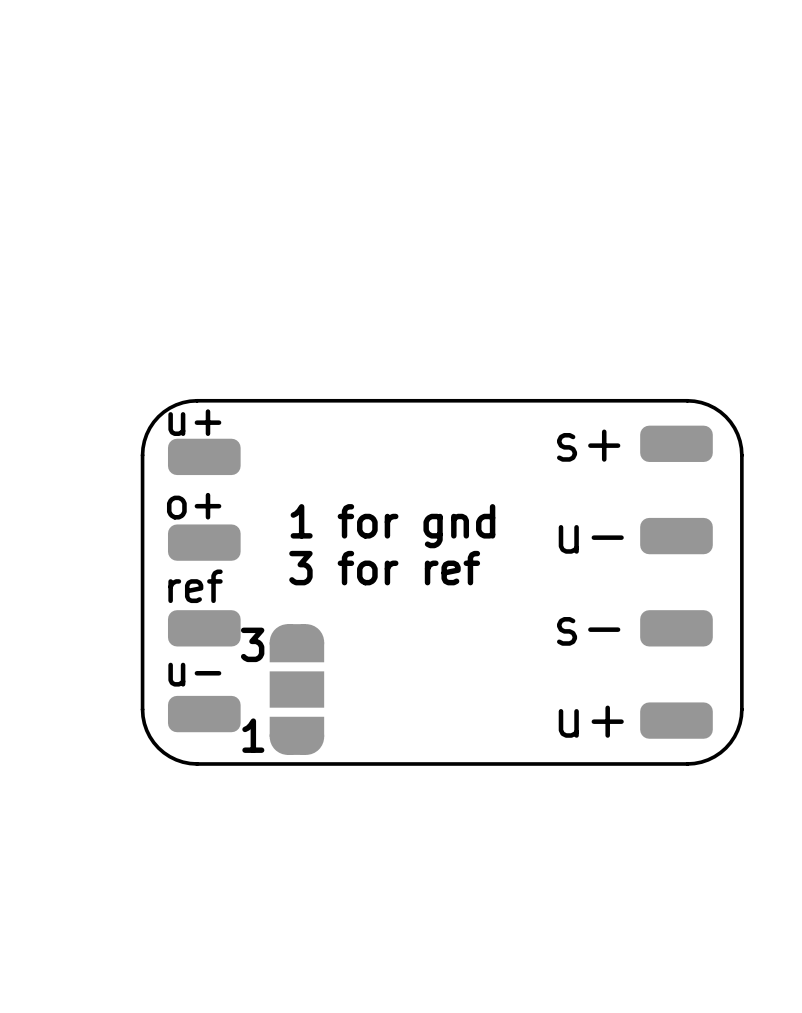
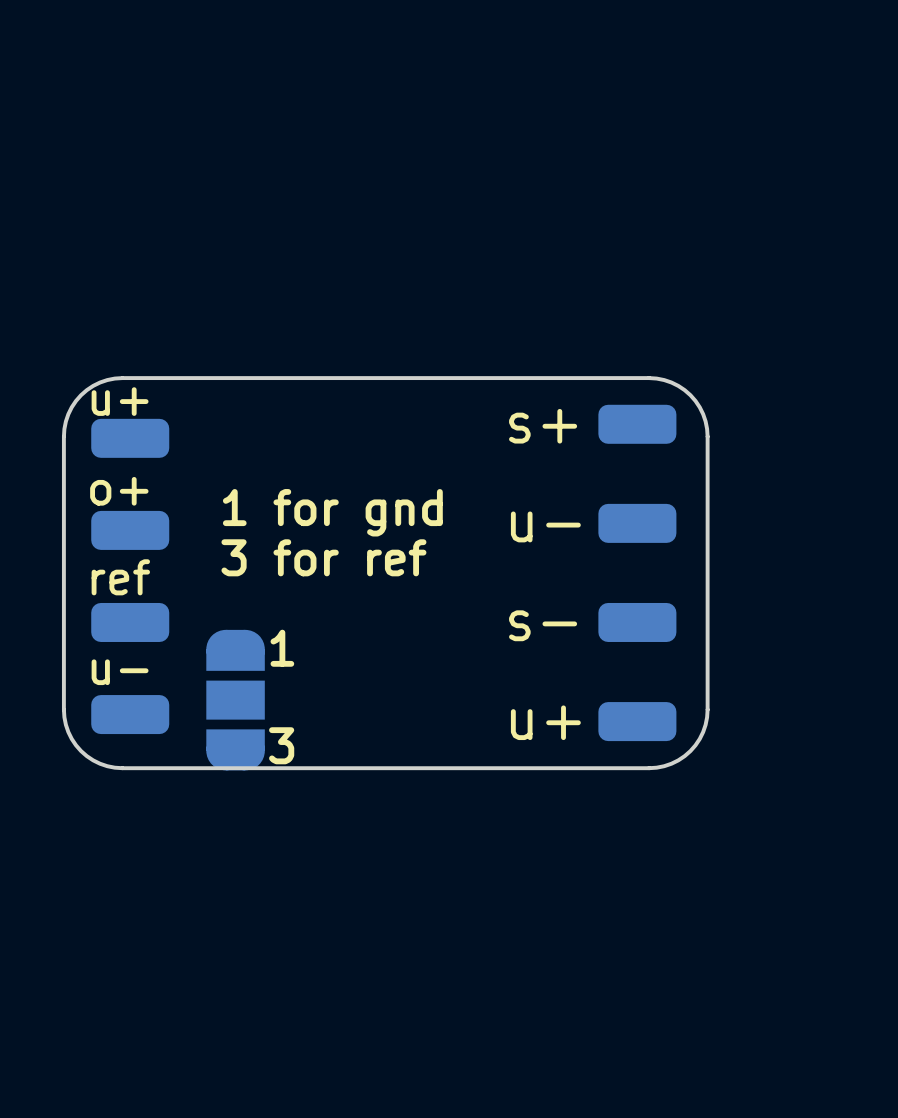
part rotation: 0° (296, 689) -> 180° (235, 700)

